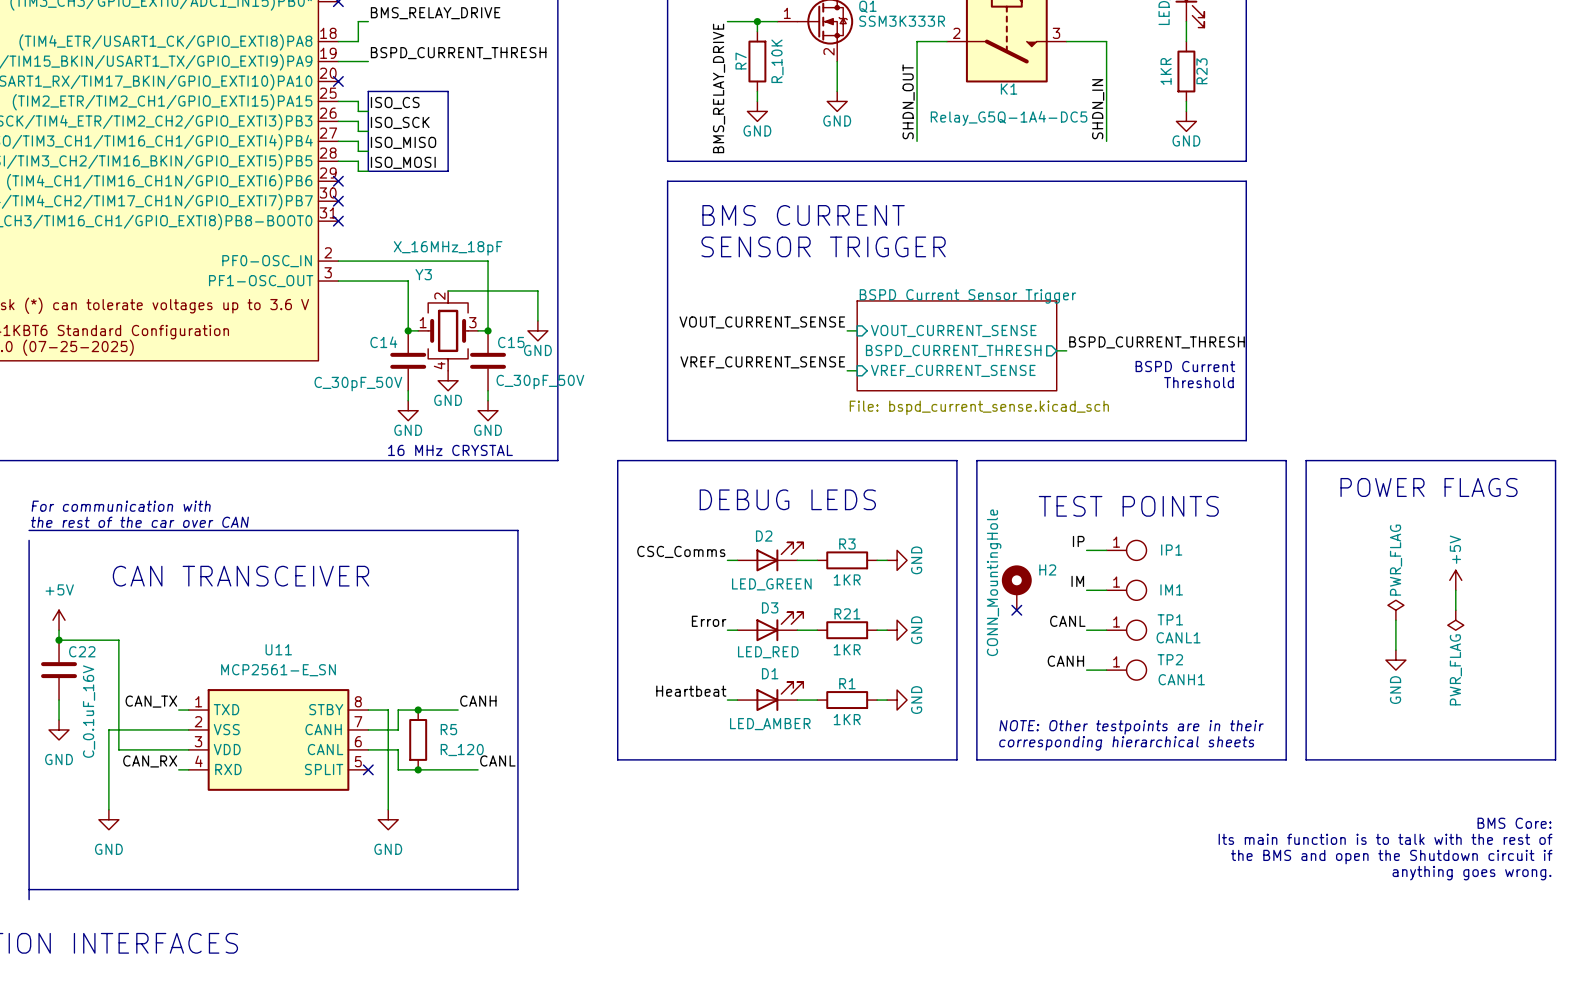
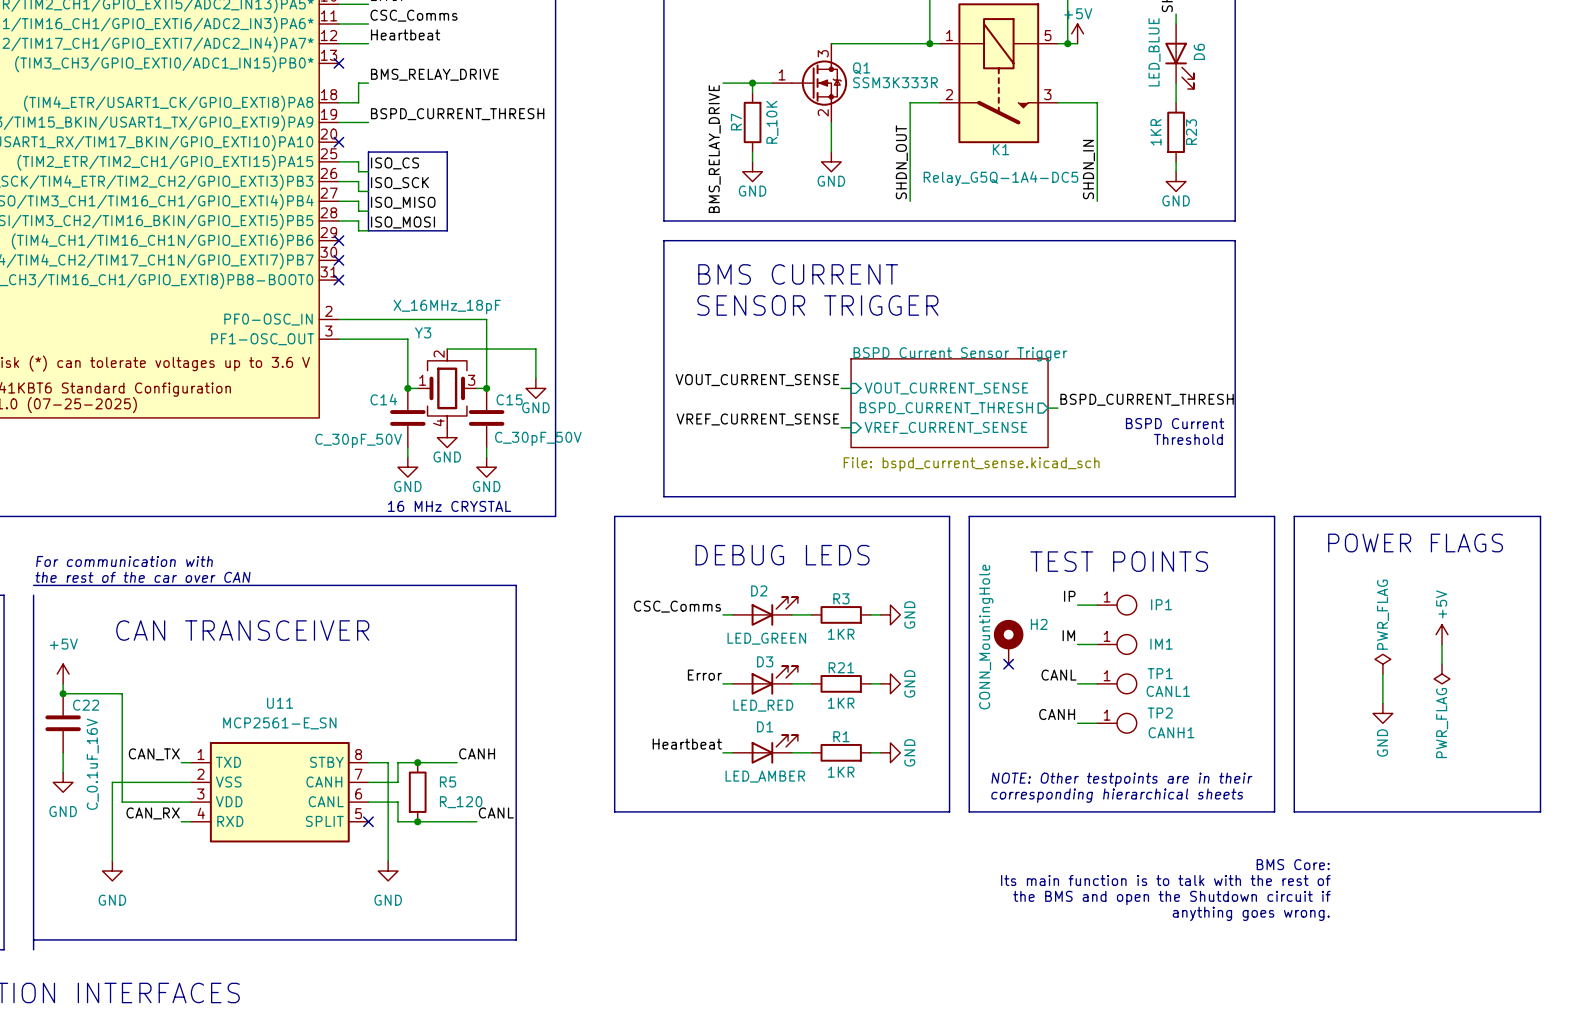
text: none -> BMS Core: (1293, 864)
text: BMS Core: (1514, 823) -> none
text: none -> Its main function is to talk with the rest of (1165, 880)
text: Its main function is to talk with the rest of (1385, 839) -> none
text: none -> the BMS and open the Shutdown circuit if (1171, 897)
text: the BMS and open the Shutdown circuit if (1391, 857) -> none
text: none -> anything goes wrong. (1251, 913)
text: anything goes wrong. (1472, 873) -> none

